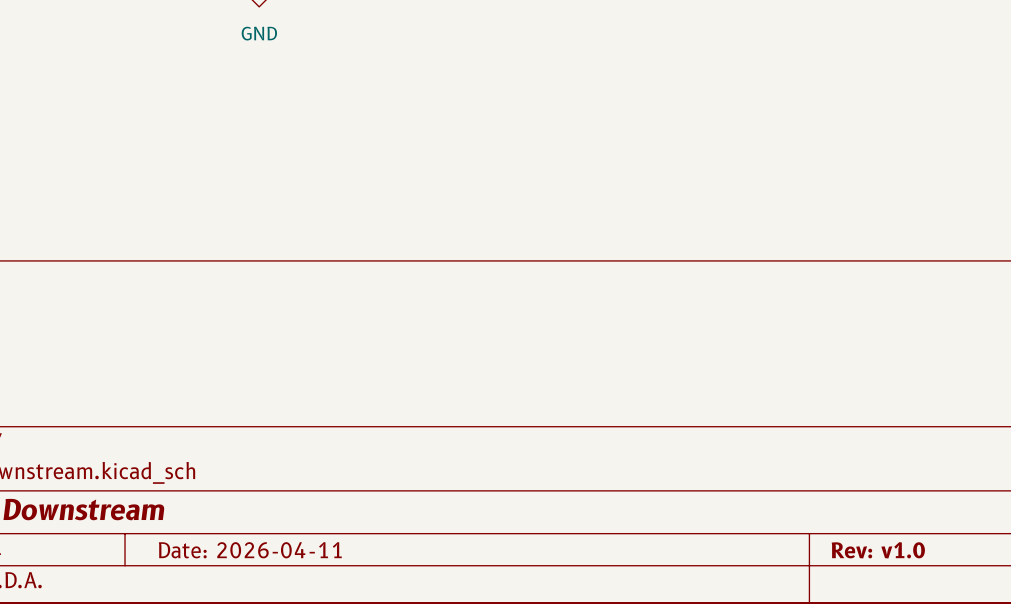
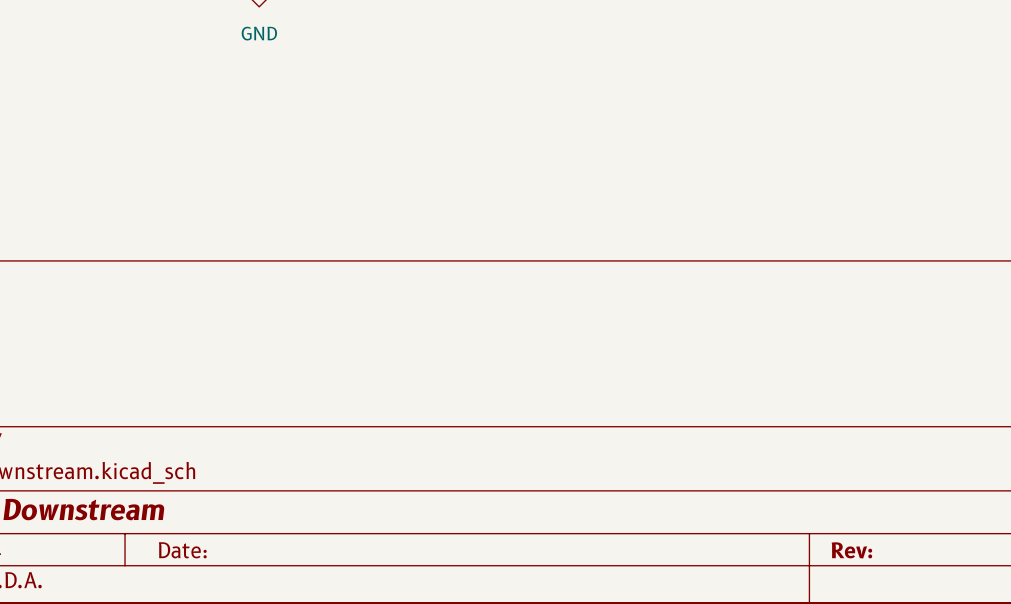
title block: Date: 2026-04-11 (250, 550) -> Date: (182, 550)
title block: Rev: v1.0 (878, 550) -> Rev: (851, 550)

